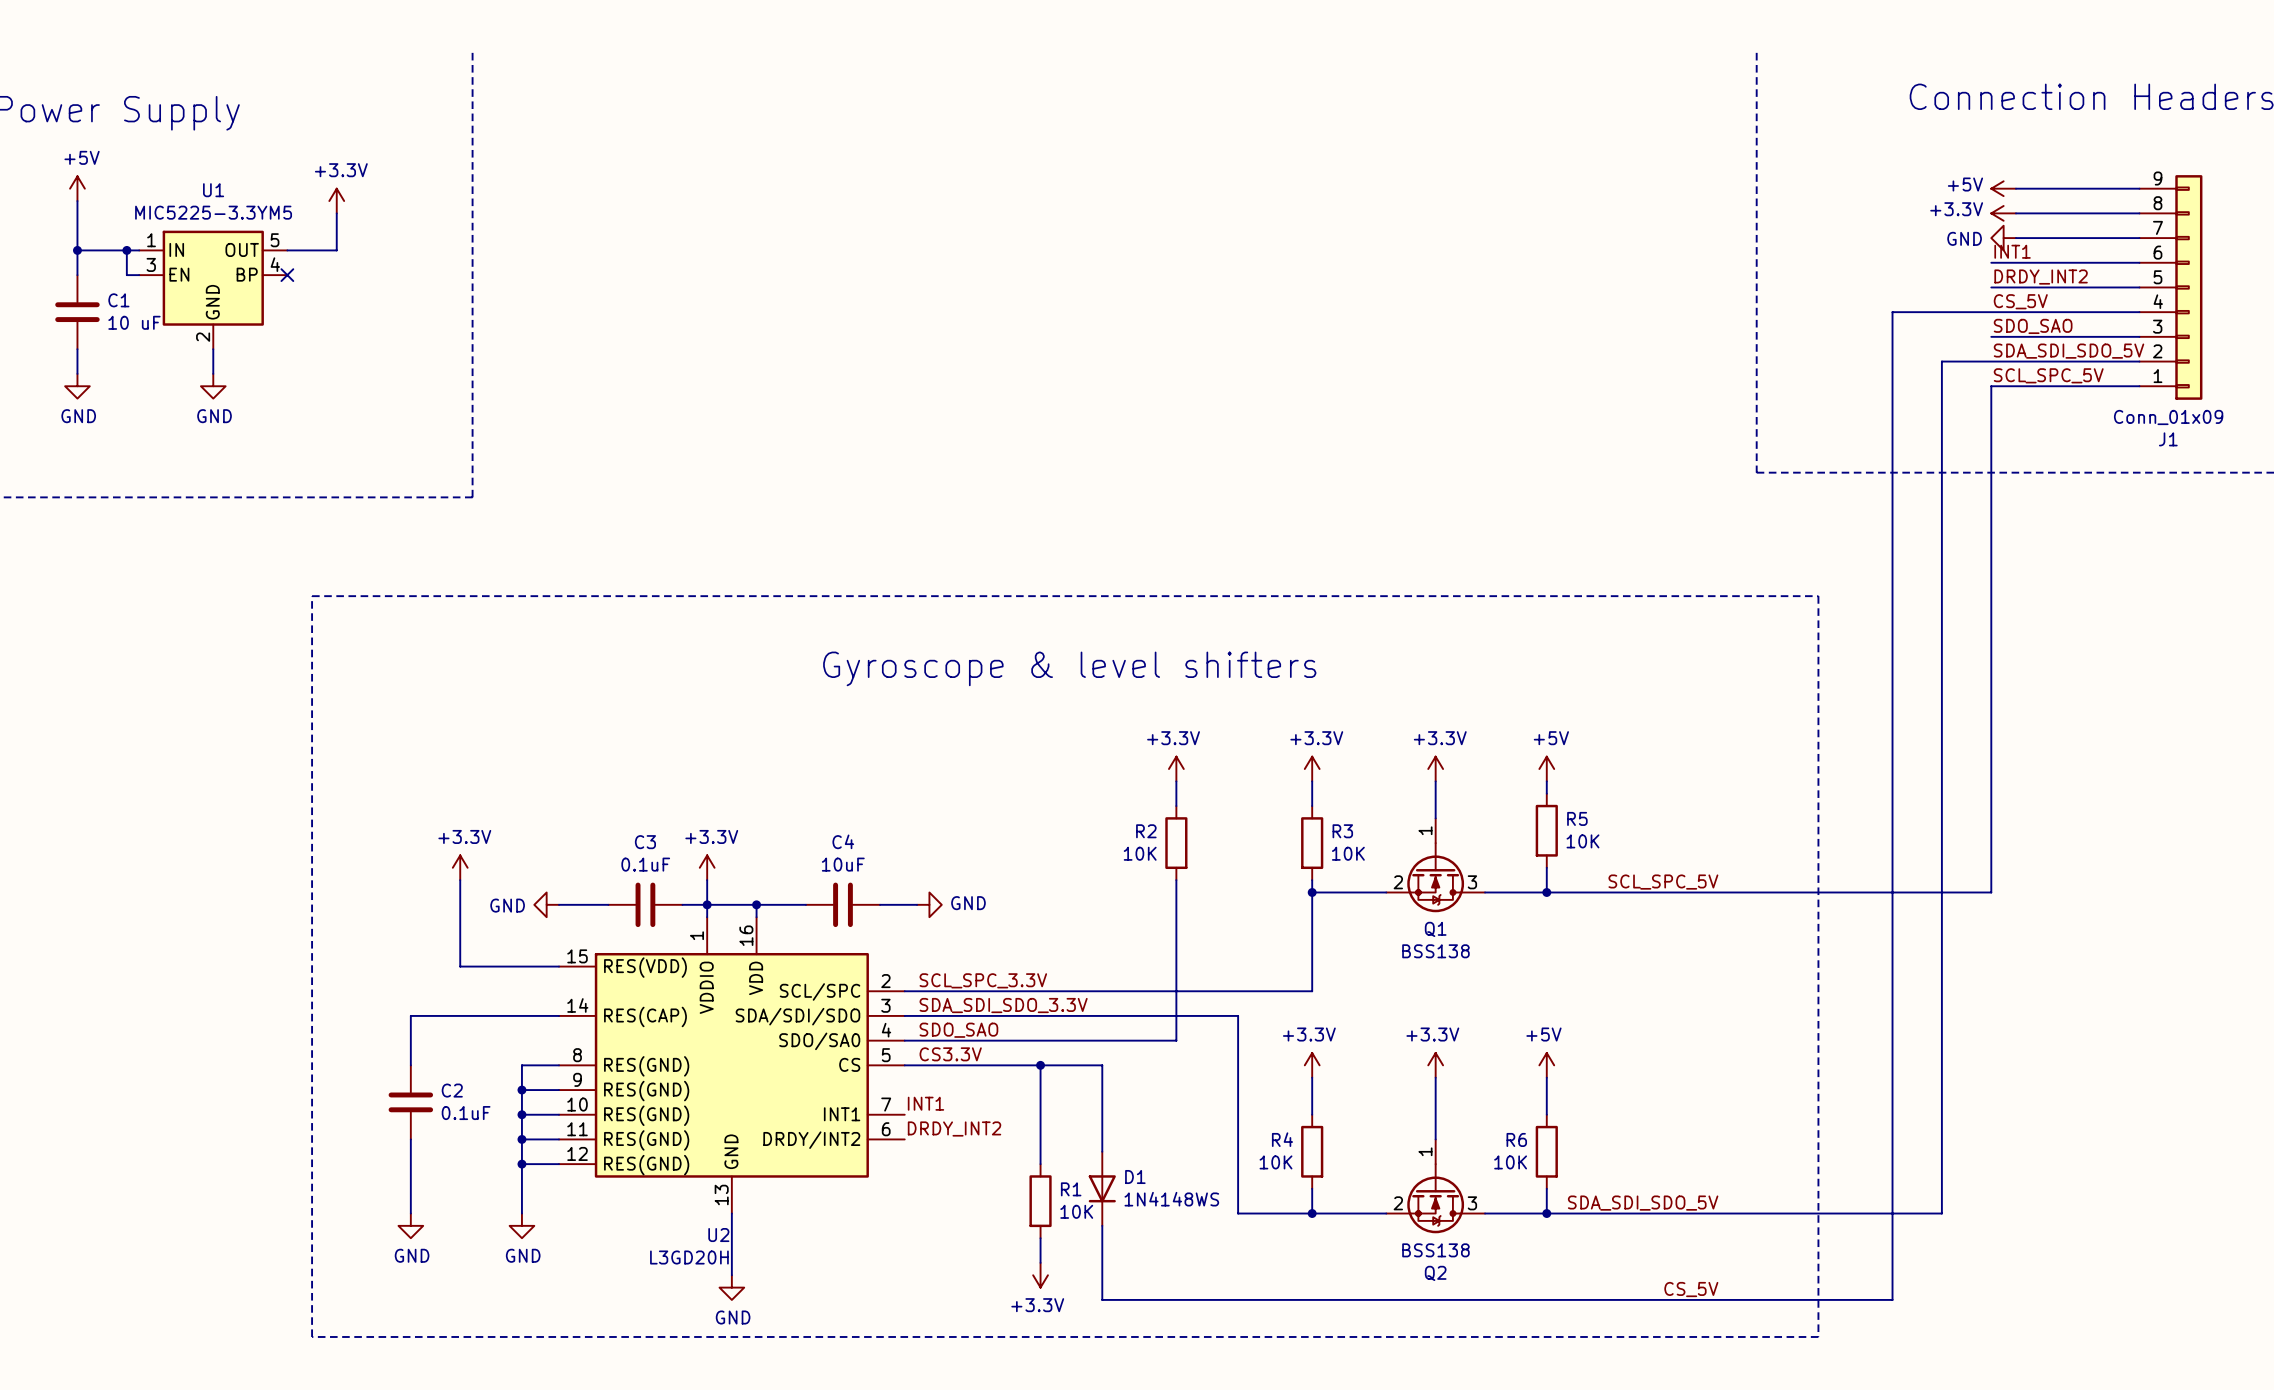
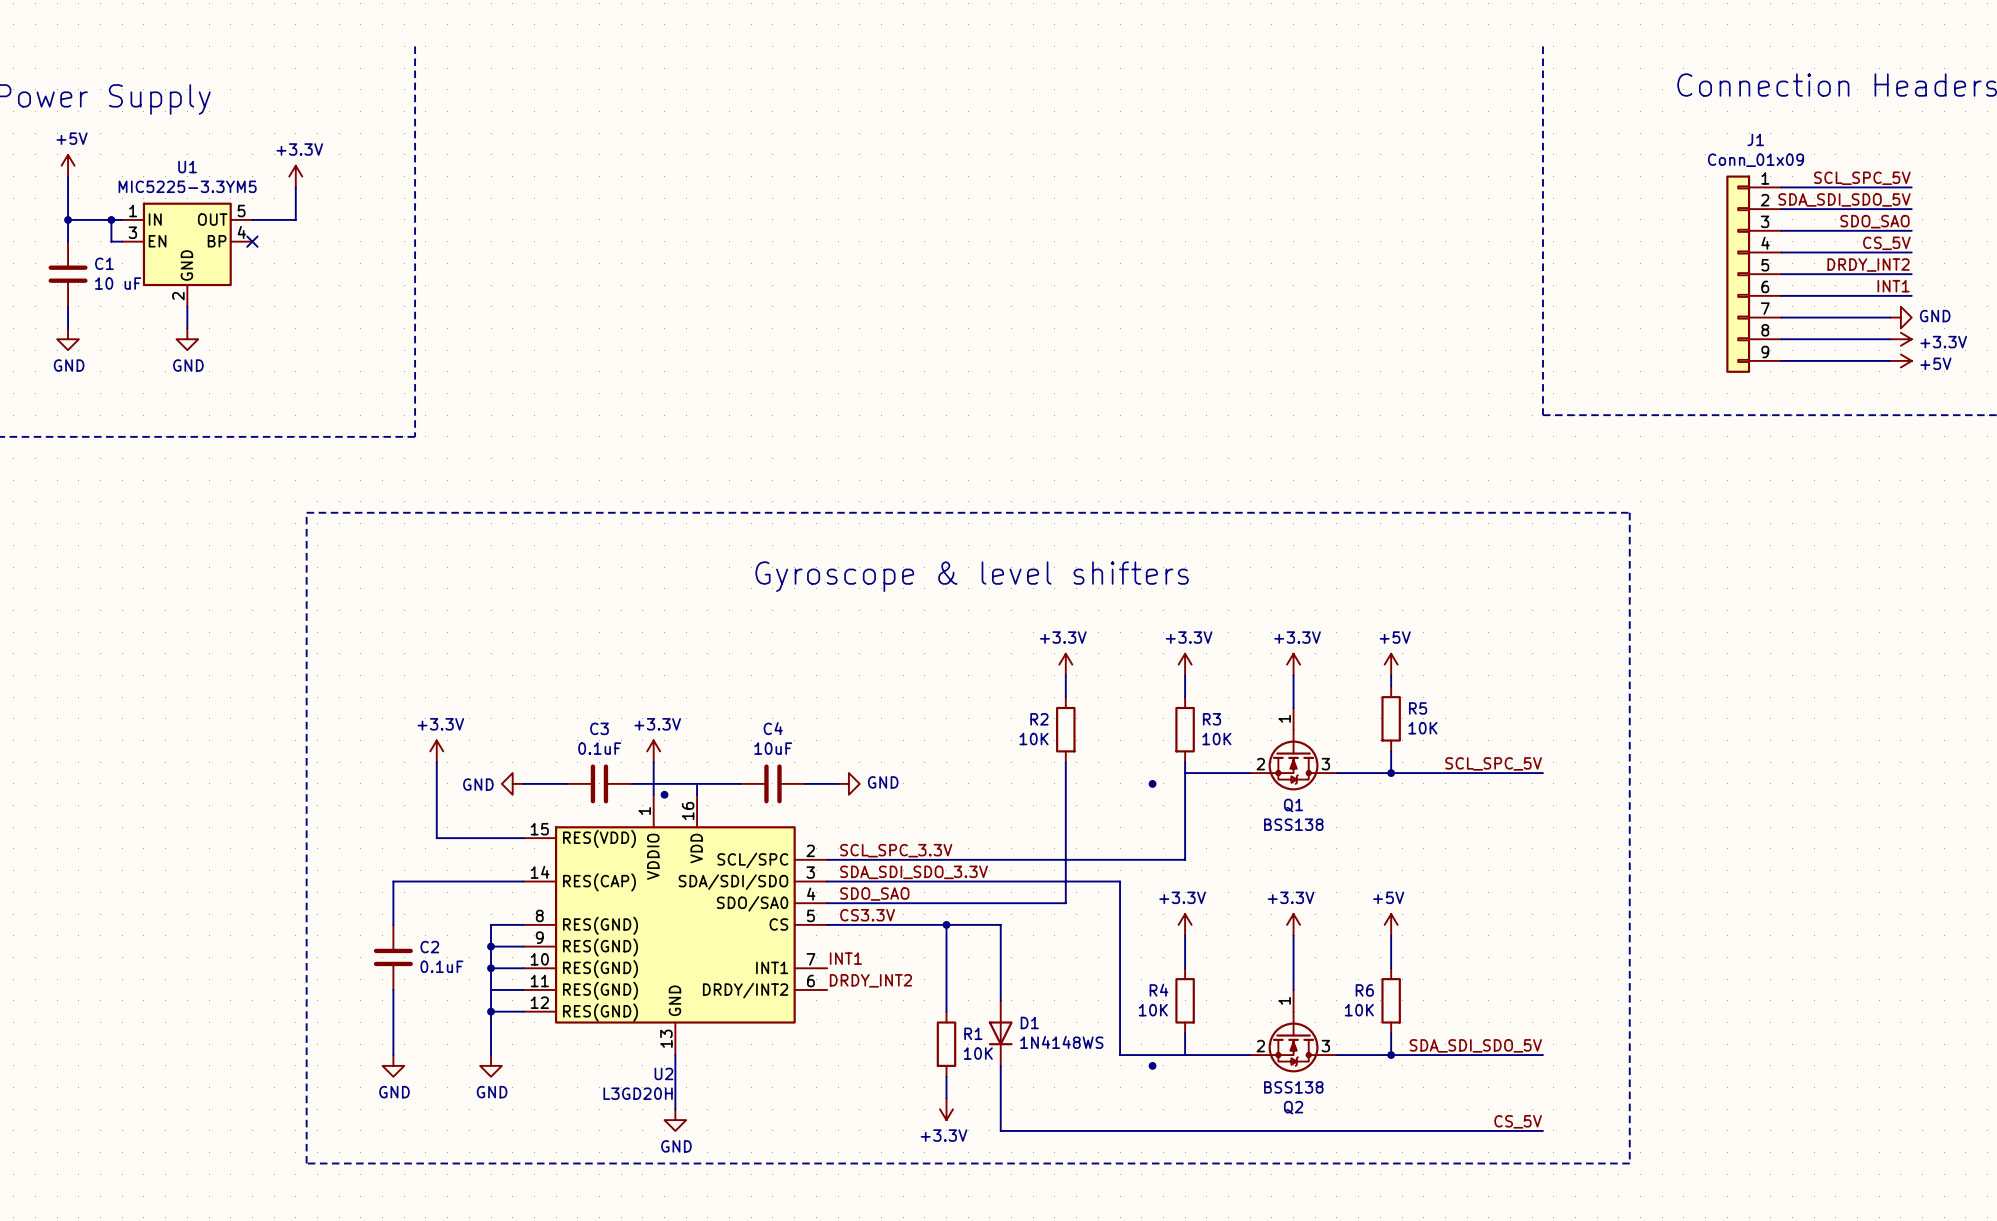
power symbol: +5V (2003, 188) -> none
wire: (2015, 188) (2139, 188) -> (1781, 360) (1890, 360)
label: none -> SCL_SPC_5V (1862, 178)
power symbol rotation: 0° (2003, 213) -> 180° (1900, 339)
power symbol position: +3.3V (2003, 213) -> +3.3V (1900, 339)
power symbol rotation: 0° (2003, 238) -> 180° (1900, 317)
power symbol position: GND (2003, 238) -> GND (1900, 317)
label position: INT1 (2012, 251) -> INT1 (1893, 286)
label position: DRDY_INT2 (2041, 277) -> DRDY_INT2 (1868, 265)
J1 position: (2170, 287) -> (1753, 274)
J1 rotation: 0° (2188, 287) -> 180° (1738, 274)
label position: CS_5V (2020, 301) -> CS_5V (1886, 243)
wire: (2028, 312) (1892, 312) (1892, 1299) (1102, 1299) (1102, 1225) -> none
label position: SDO_SAO (2033, 326) -> SDO_SAO (1874, 221)
label position: SDA_SDI_SDO_5V (2069, 351) -> SDA_SDI_SDO_5V (1844, 199)
wire: (2028, 361) (1941, 361) (1941, 1213) (1485, 1213) -> none
label: SCL_SPC_5V (2048, 375) -> none
wire: (2028, 386) (1991, 386) (1991, 892) (1485, 892) -> none
power symbol: none -> +5V (1900, 360)
line: (312, 596) (312, 1336) (1818, 1336) (1818, 596) (312, 596) -> (306, 512) (306, 1163) (1629, 1163) (1629, 512) (306, 512)
text position: Gyroscope & level shifters (1069, 668) -> Gyroscope & level shifters (972, 576)
power symbol position: +3.3V (1176, 769) -> +3.3V (1065, 664)
power symbol position: +3.3V (1312, 769) -> +3.3V (1185, 664)
power symbol position: +3.3V (1435, 769) -> +3.3V (1293, 664)
power symbol position: +5V (1546, 769) -> +5V (1391, 664)
wire: (1176, 781) (1176, 806) -> (1065, 675) (1065, 697)
wire: (1312, 781) (1312, 806) -> (1185, 675) (1185, 697)
wire: (1435, 781) (1435, 818) -> (1293, 675) (1293, 708)
wire: (1546, 781) (1546, 793) -> (1391, 675) (1391, 686)
R5 position: (1546, 830) -> (1391, 718)
R2 position: (1176, 843) -> (1065, 729)
R3 position: (1312, 843) -> (1185, 729)
Q1 position: (1435, 865) -> (1293, 749)
power symbol position: +3.3V (460, 867) -> +3.3V (436, 751)
power symbol position: +3.3V (707, 867) -> +3.3V (653, 751)
wire: (1546, 867) (1546, 892) -> (1391, 751) (1391, 773)
wire: (460, 880) (460, 966) (559, 966) -> (436, 762) (436, 838) (523, 838)
wire: (707, 880) (707, 917) -> (653, 762) (653, 794)
wire: (1176, 880) (1176, 1040) (904, 1040) -> (1065, 762) (1065, 903) (827, 903)
wire: (1312, 880) (1312, 991) (904, 991) -> (1185, 762) (1185, 859) (827, 859)
wire: none -> (1336, 773) (1542, 773)
label position: SCL_SPC_5V (1663, 882) -> SCL_SPC_5V (1493, 763)
wire: (1312, 892) (1386, 892) -> (1185, 773) (1250, 773)
junction position: (1546, 892) -> (1391, 773)
power symbol position: GND (546, 904) -> GND (512, 783)
wire: (559, 904) (608, 904) -> (523, 783) (566, 783)
C3 position: (645, 904) -> (599, 783)
wire: (682, 904) (805, 904) -> (631, 783) (740, 783)
junction: (707, 904) -> none
wire: (756, 904) (756, 917) -> (697, 783) (697, 794)
C4 position: (842, 904) -> (772, 783)
wire: (880, 904) (917, 904) -> (805, 783) (838, 783)
power symbol position: GND (929, 904) -> GND (848, 783)
label position: SCL_SPC_3.3V (983, 980) -> SCL_SPC_3.3V (896, 850)
label position: SDA_SDI_SDO_3.3V (1003, 1005) -> SDA_SDI_SDO_3.3V (914, 872)
wire: (559, 1015) (410, 1015) (410, 1065) -> (523, 881) (393, 881) (393, 924)
wire: (904, 1015) (1238, 1015) (1238, 1213) (1386, 1213) -> (827, 881) (1120, 881) (1120, 1055) (1250, 1055)
label position: SDO_SAO (958, 1030) -> SDO_SAO (874, 894)
label position: CS3.3V (950, 1054) -> CS3.3V (867, 915)
wire: (559, 1065) (521, 1065) (521, 1213) -> (523, 924) (491, 924) (491, 1055)
U2 position: (731, 1065) -> (675, 924)
wire: (904, 1065) (1102, 1065) (1102, 1151) -> (827, 924) (1000, 924) (1000, 1000)
wire: (1040, 1065) (1040, 1164) -> (946, 924) (946, 1011)
junction position: (1040, 1065) -> (946, 924)
power symbol position: +3.3V (1312, 1065) -> +3.3V (1185, 924)
power symbol position: +3.3V (1435, 1065) -> +3.3V (1293, 924)
power symbol position: +5V (1546, 1065) -> +5V (1391, 924)
junction: none -> (491, 946)
wire: (1312, 1077) (1312, 1114) -> (1185, 935) (1185, 968)
wire: (1435, 1077) (1435, 1139) -> (1293, 935) (1293, 989)
wire: (1546, 1077) (1546, 1114) -> (1391, 935) (1391, 968)
wire: (521, 1090) (559, 1090) -> (491, 946) (523, 946)
junction: (521, 1090) -> none
C2 position: (410, 1102) -> (393, 957)
junction: none -> (491, 968)
label position: INT1 (925, 1103) -> INT1 (845, 958)
wire: (521, 1114) (559, 1114) -> (491, 968) (523, 968)
junction: (521, 1114) -> none
label position: DRDY_INT2 (954, 1129) -> DRDY_INT2 (870, 980)
wire: (410, 1139) (410, 1213) -> (393, 989) (393, 1055)
wire: (521, 1139) (559, 1139) -> (491, 989) (523, 989)
junction: (521, 1139) -> none
junction: none -> (491, 1011)
R4 position: (1312, 1151) -> (1185, 1000)
R6 position: (1546, 1151) -> (1391, 1000)
wire: (521, 1164) (559, 1164) -> (491, 1011) (523, 1011)
junction: (521, 1164) -> none
Q2 position: (1435, 1186) -> (1293, 1031)
D1 position: (1102, 1188) -> (1000, 1033)
wire: (1312, 1188) (1312, 1213) -> (1185, 1033) (1185, 1055)
wire: (1546, 1188) (1546, 1213) -> (1391, 1033) (1391, 1055)
R1 position: (1040, 1201) -> (946, 1044)
wire: none -> (1336, 1055) (1542, 1055)
label position: SDA_SDI_SDO_5V (1643, 1203) -> SDA_SDI_SDO_5V (1475, 1045)
power symbol: none -> GND (393, 1065)
power symbol: none -> GND (491, 1065)
wire: (731, 1213) (731, 1275) -> (675, 1055) (675, 1109)
wire: none -> (1000, 1065) (1000, 1130) (1542, 1130)
junction position: (1546, 1213) -> (1391, 1055)
power symbol: GND (410, 1225) -> none
power symbol: GND (521, 1225) -> none
wire: (1040, 1238) (1040, 1262) -> (946, 1076) (946, 1098)
power symbol position: +3.3V (1040, 1275) -> +3.3V (946, 1109)
power symbol position: GND (731, 1287) -> GND (675, 1120)
label position: CS_5V (1691, 1289) -> CS_5V (1518, 1121)

